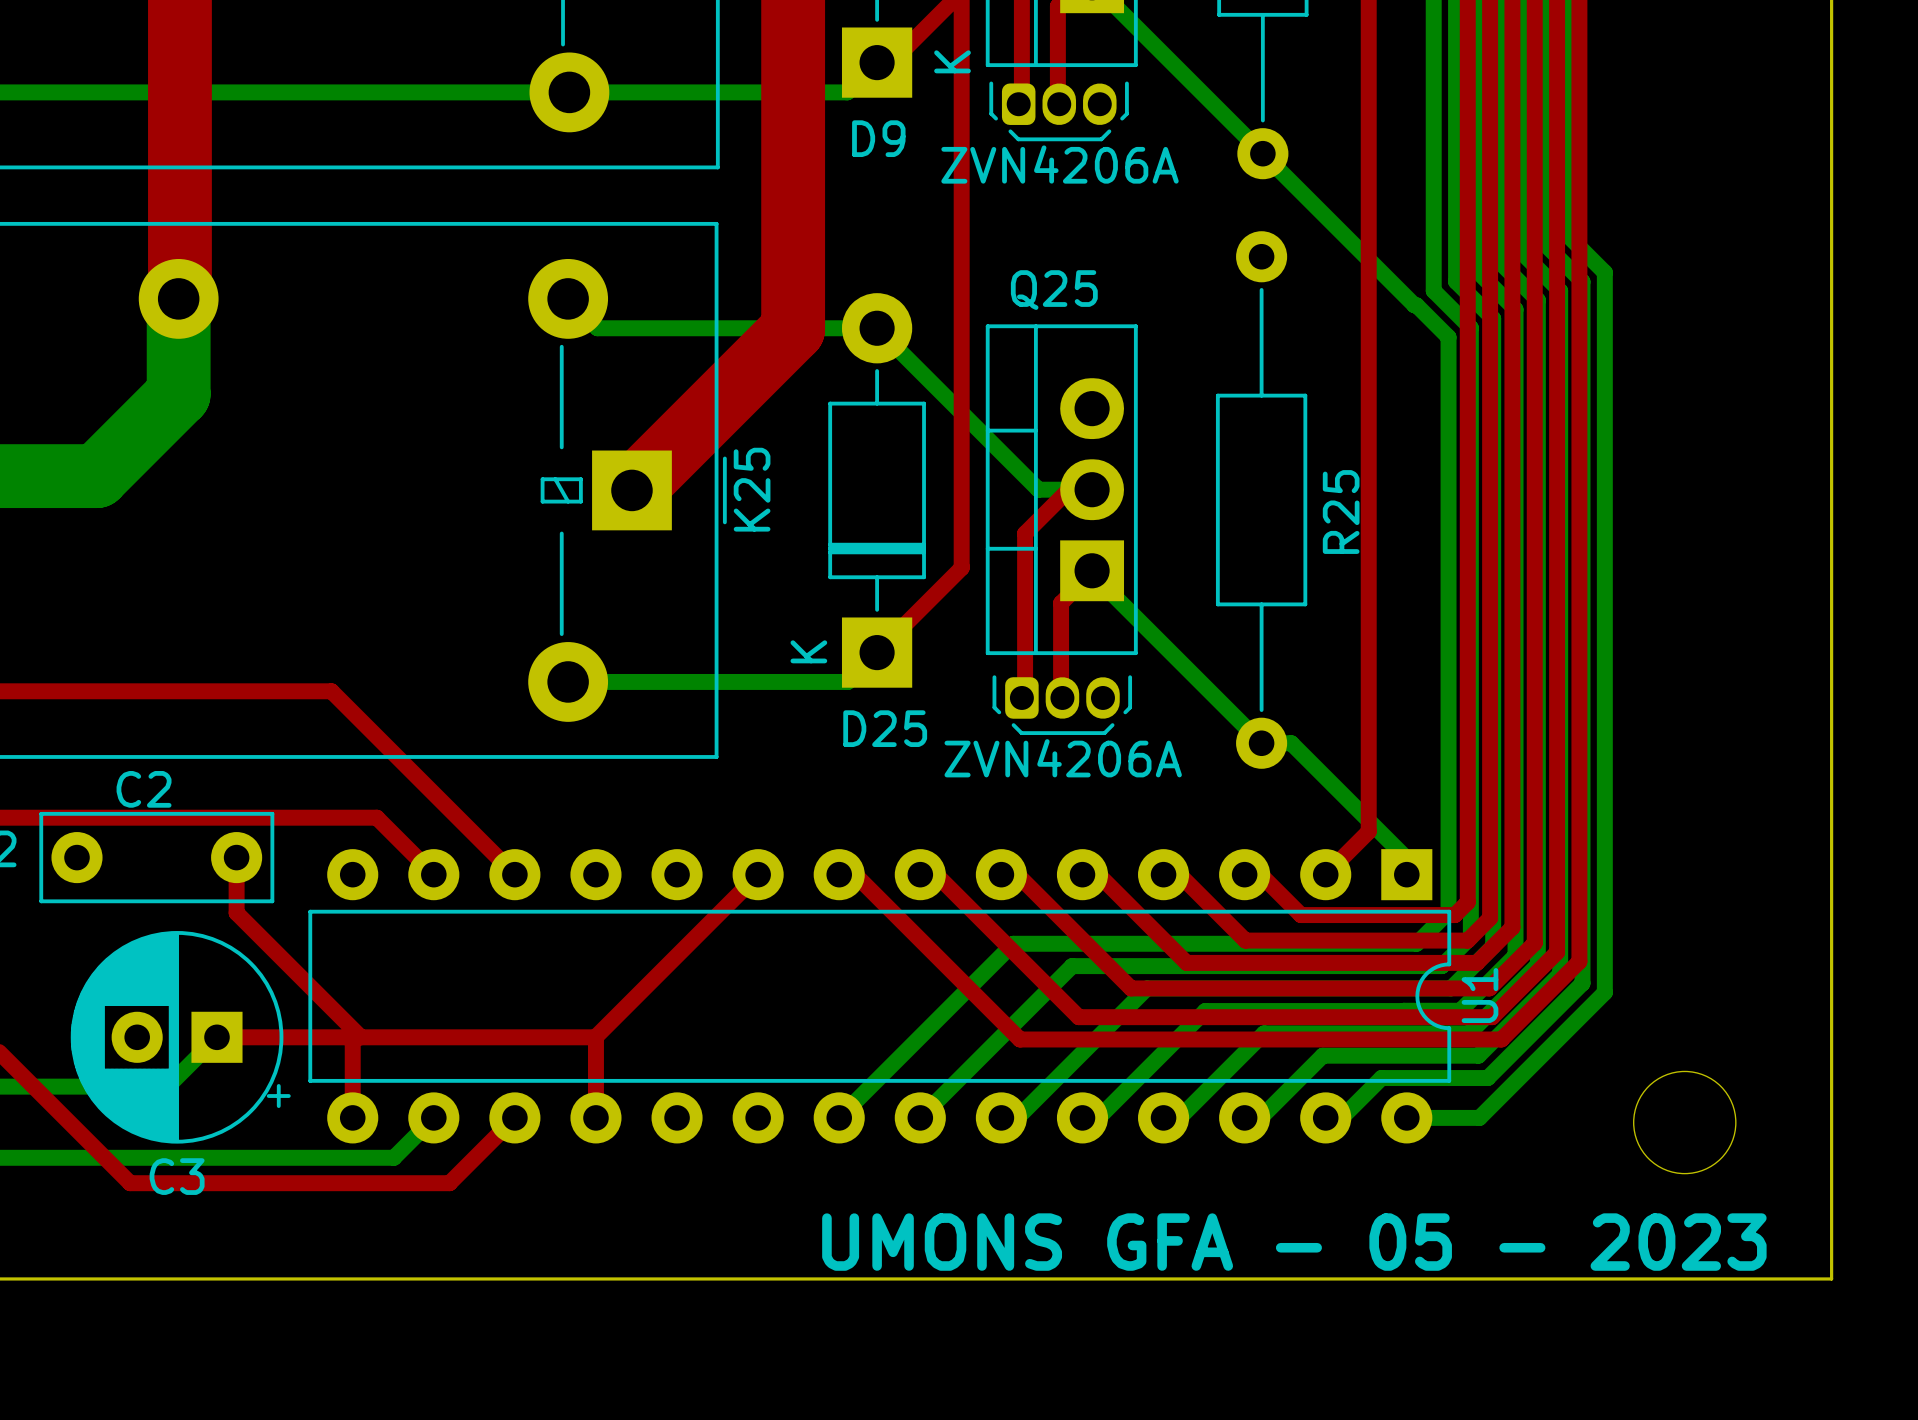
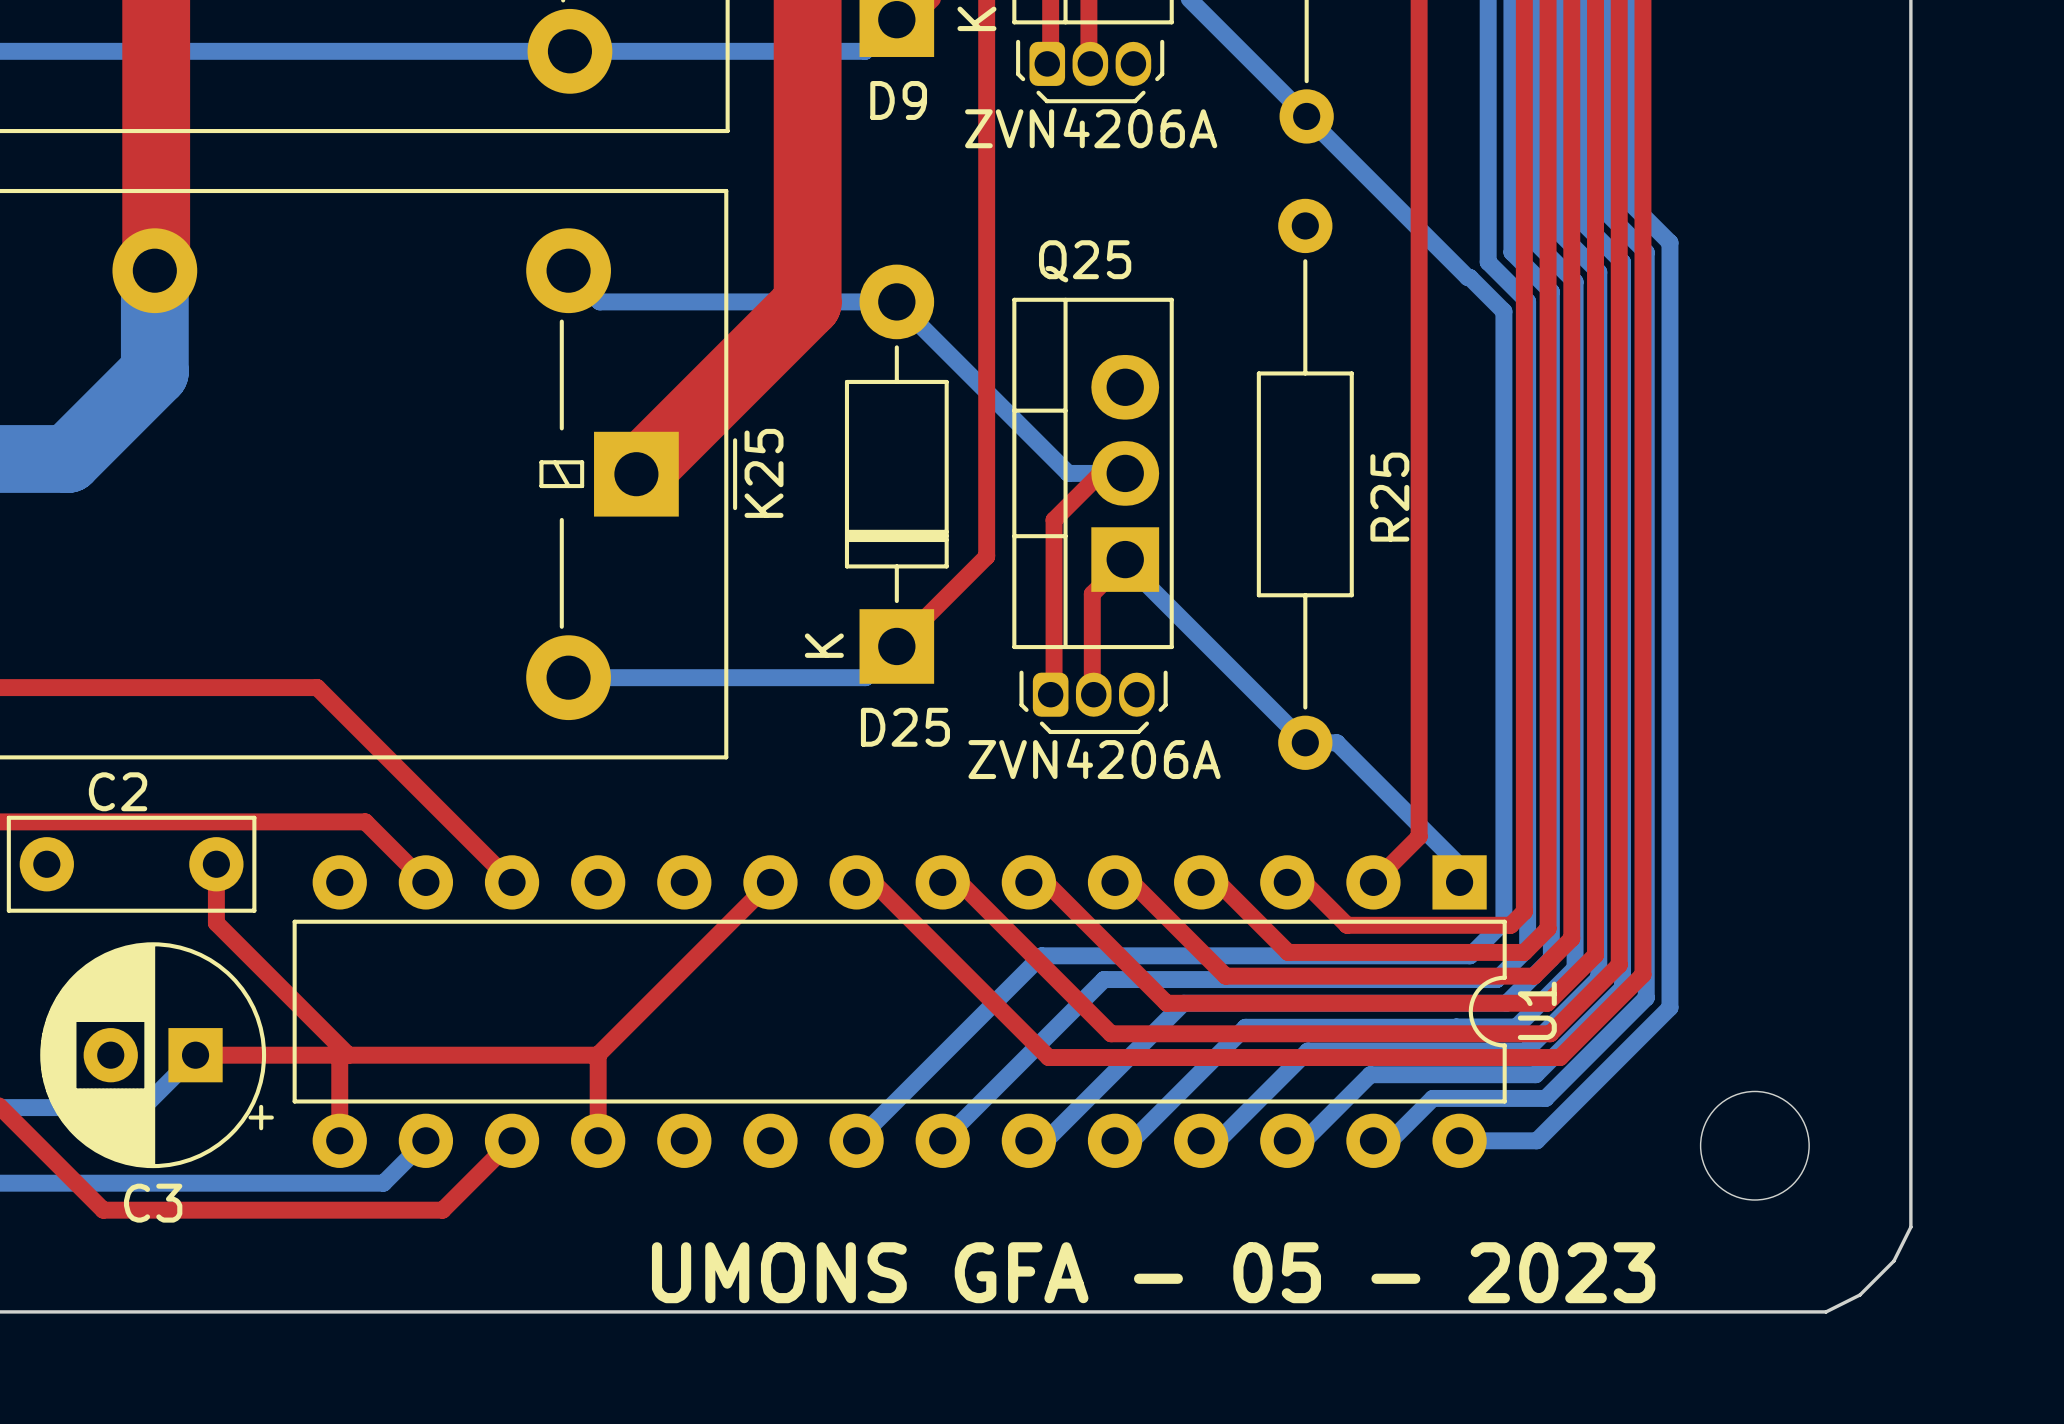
board edge: (1831, 1199) (1831, 1278) (1751, 1278) -> (1910, 1227) (1893, 1261) (1860, 1294) (1826, 1311)
text position: UMONS GFA - 05 - 2023 (1294, 1242) -> UMONS GFA - 05 - 2023 (1153, 1272)

